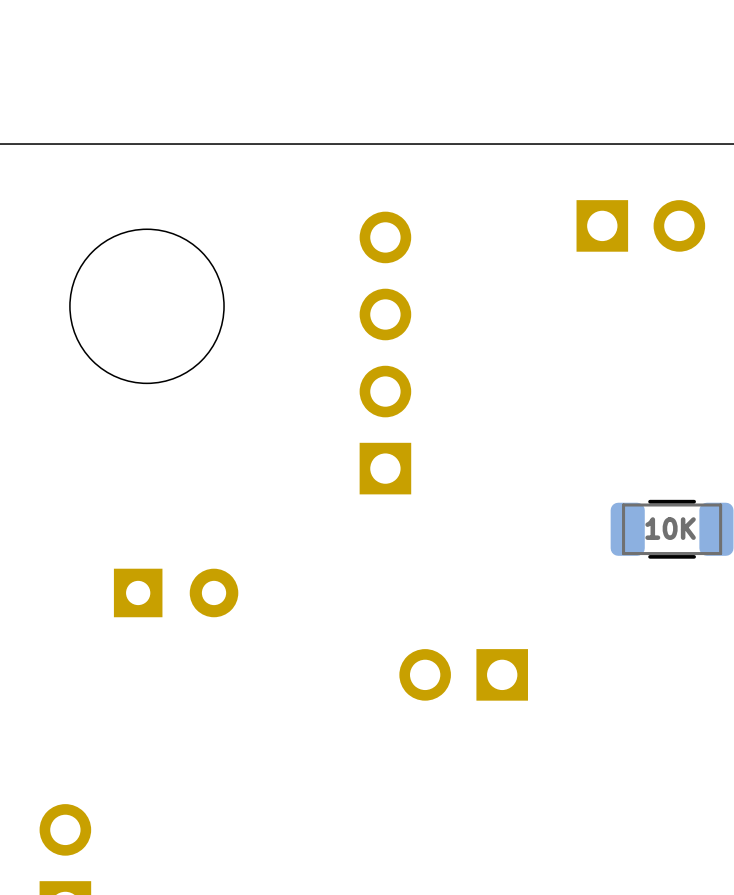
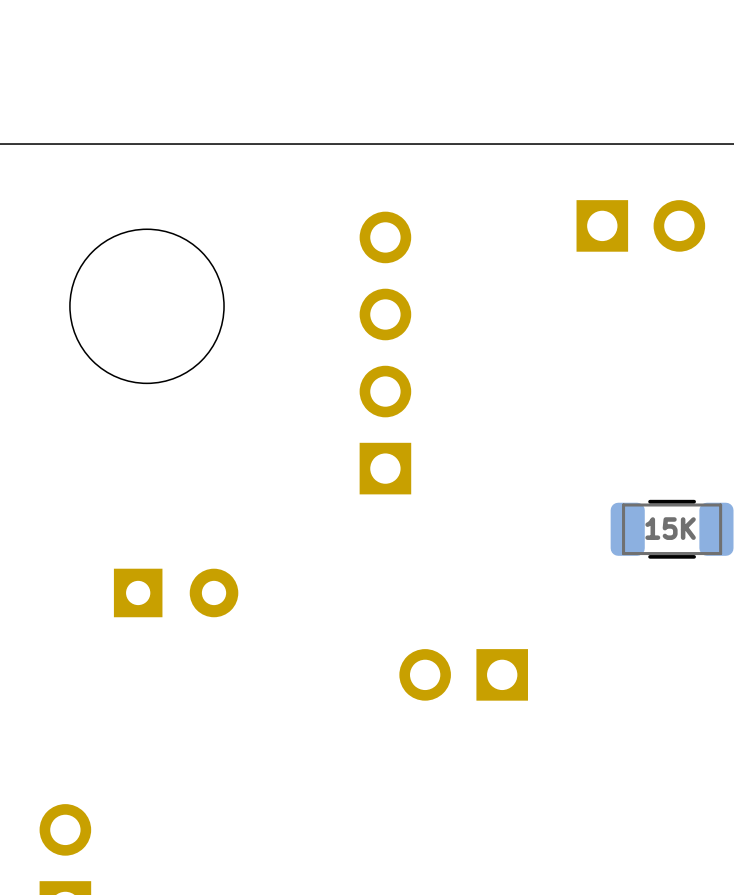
part value: 10K (670, 528) -> 15K (670, 528)

